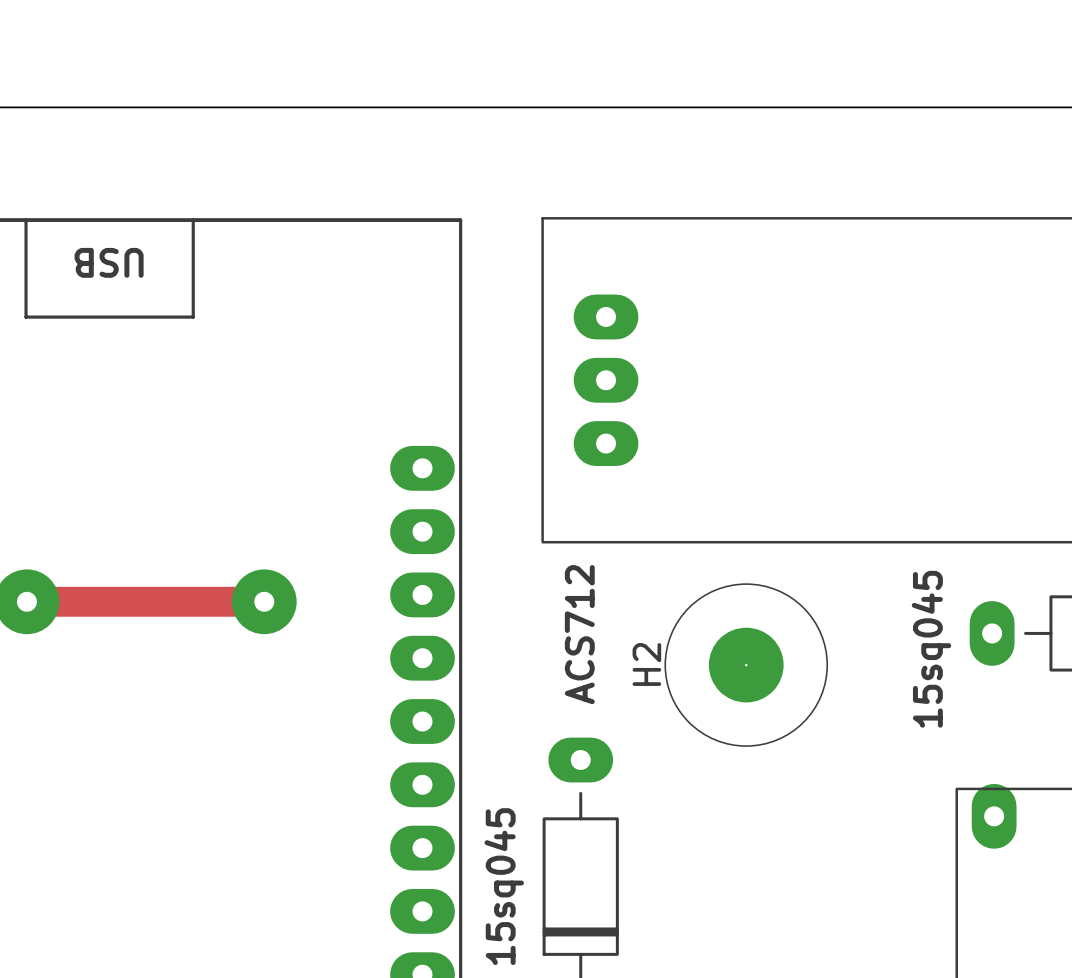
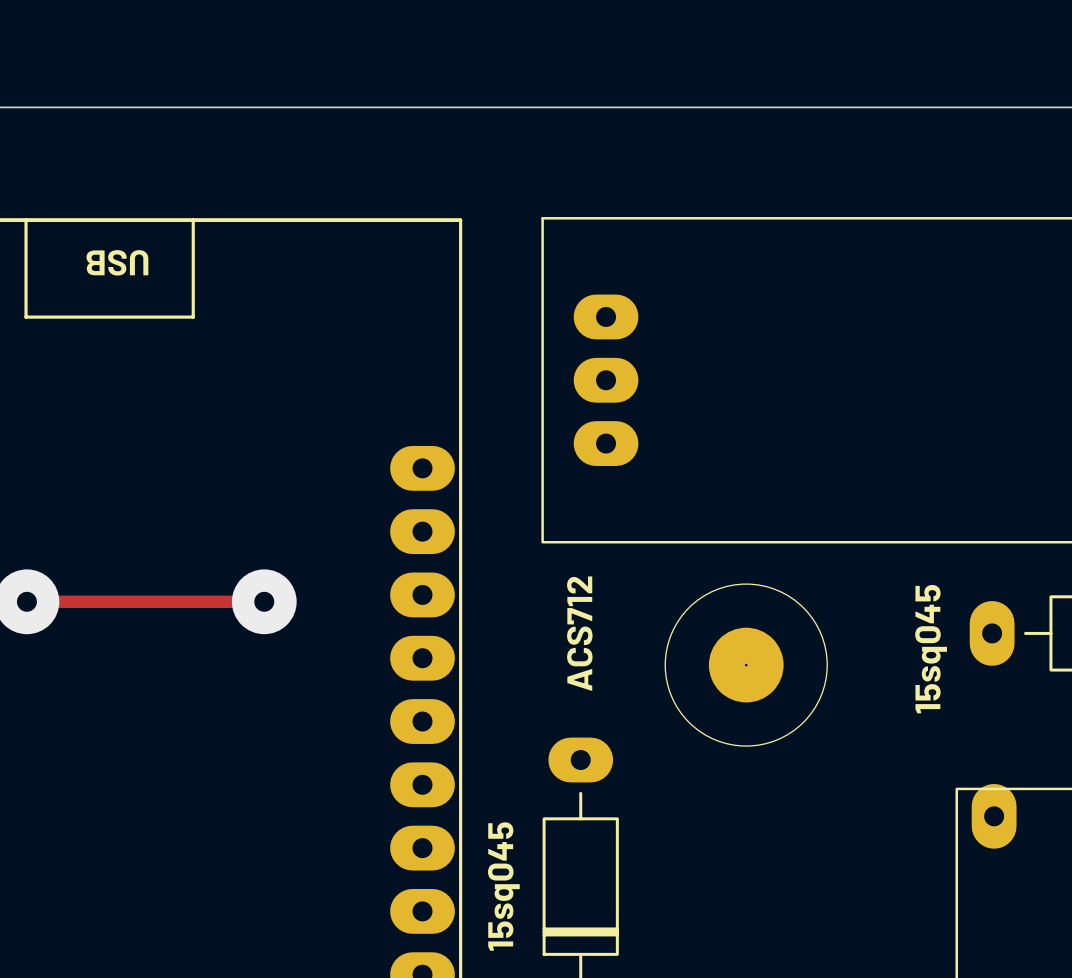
track width: thick (26, 601) (264, 601) -> thin (26, 601) (264, 601)
H2 name: H2 (646, 664) -> none

